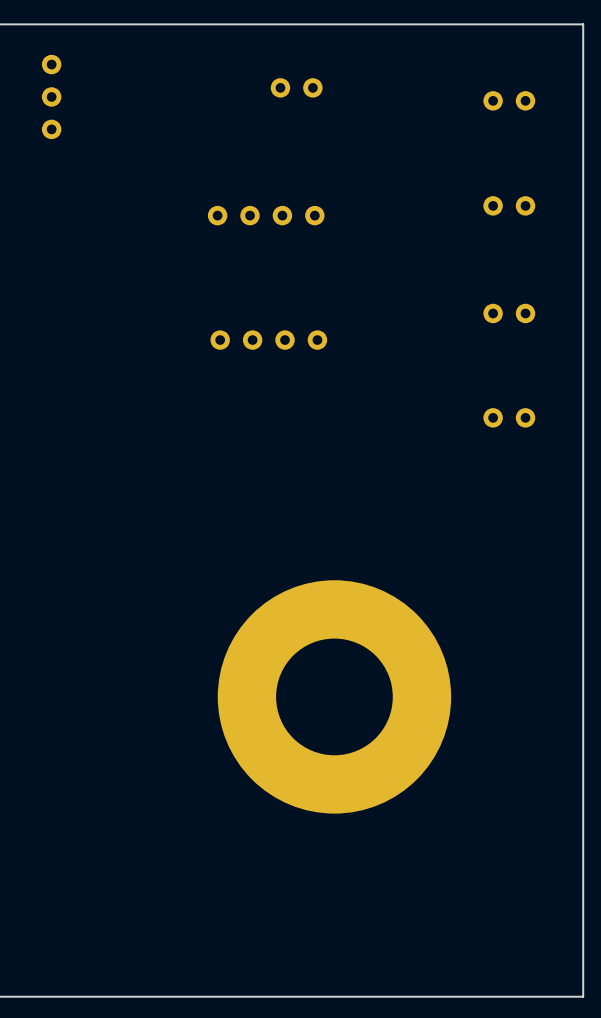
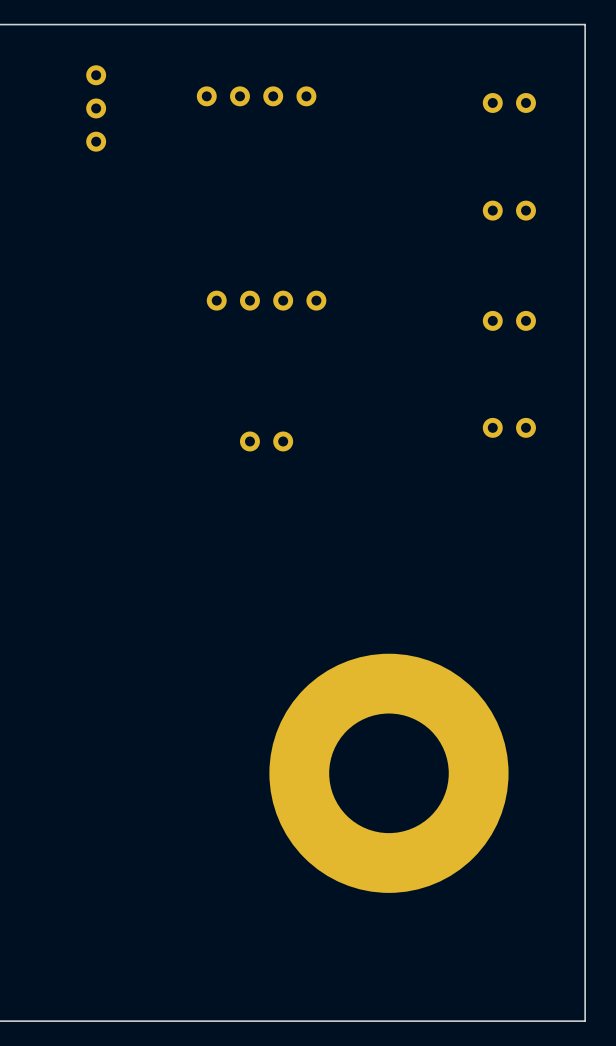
part: (296, 87) -> none
part: none -> (256, 96)
part position: (51, 96) -> (96, 108)
part: (266, 215) -> none
part: none -> (266, 300)
part: (268, 340) -> none
part: none -> (266, 441)
part position: (334, 696) -> (388, 773)

